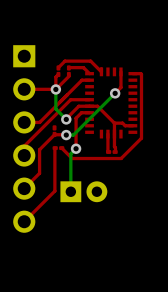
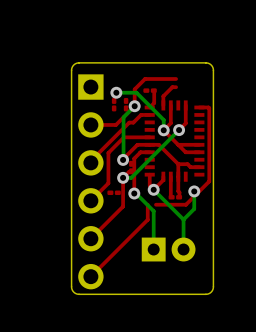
board edge: none -> (205, 62) (79, 62) (72, 66) (71, 286) (75, 293) (205, 294) (212, 290) (213, 70) (211, 65) (205, 62)
top track: none -> (176, 79) (145, 79) (134, 89) (134, 106) (115, 124) (90, 124)
top track: none -> (176, 87) (172, 87) (163, 96) (163, 101)
part: none -> (150, 90)
bottom track: none -> (116, 92) (136, 92) (163, 119) (163, 130)
via: none -> (116, 92)
top track: (58, 67) (64, 61) (90, 61) (101, 71) -> none
top track: (68, 67) (83, 67) (89, 73) -> (154, 90) (154, 103) (149, 107)
top track: none -> (170, 105) (170, 123) (163, 130) (185, 152) (199, 152)
bottom track: none -> (134, 106) (123, 117) (123, 157)
via: none -> (134, 106)
top track: (68, 74) (55, 89) (55, 77) (58, 74) -> none
top track: (75, 86) (39, 122) (24, 122) -> (133, 122) (129, 122) (90, 162)
top track: (55, 89) (24, 89) -> none
bottom track: (55, 89) (55, 109) (66, 119) -> none
via: (55, 89) -> none
via: none -> (163, 130)
top track: (70, 99) (24, 146) (24, 155) -> (128, 137) (124, 137) (108, 152) (108, 183) (90, 200)
top track: none -> (199, 144) (178, 144)
top track: none -> (131, 171) (123, 177) (123, 206) (90, 238)
part position: (54, 131) -> (131, 167)
top track: none -> (149, 174) (149, 185) (153, 189) (163, 180) (163, 176)
top track: (65, 134) (54, 134) (39, 149) (39, 173) (24, 188) -> none
part position: (24, 138) -> (90, 181)
bottom track: none -> (153, 189) (183, 219)
via: none -> (153, 189)
bottom track: none -> (133, 191) (153, 211) (153, 249)
bottom track: none -> (194, 191) (194, 208) (183, 219)
via: none -> (194, 191)
top track: (54, 148) (54, 191) (24, 221) -> none
top track: (62, 148) (72, 158) (94, 158) -> none
bottom track: (76, 148) (70, 153) (70, 191) -> none
top track: none -> (147, 204) (147, 219) (90, 276)
bottom track: none -> (183, 219) (183, 249)
part position: (83, 191) -> (168, 249)

